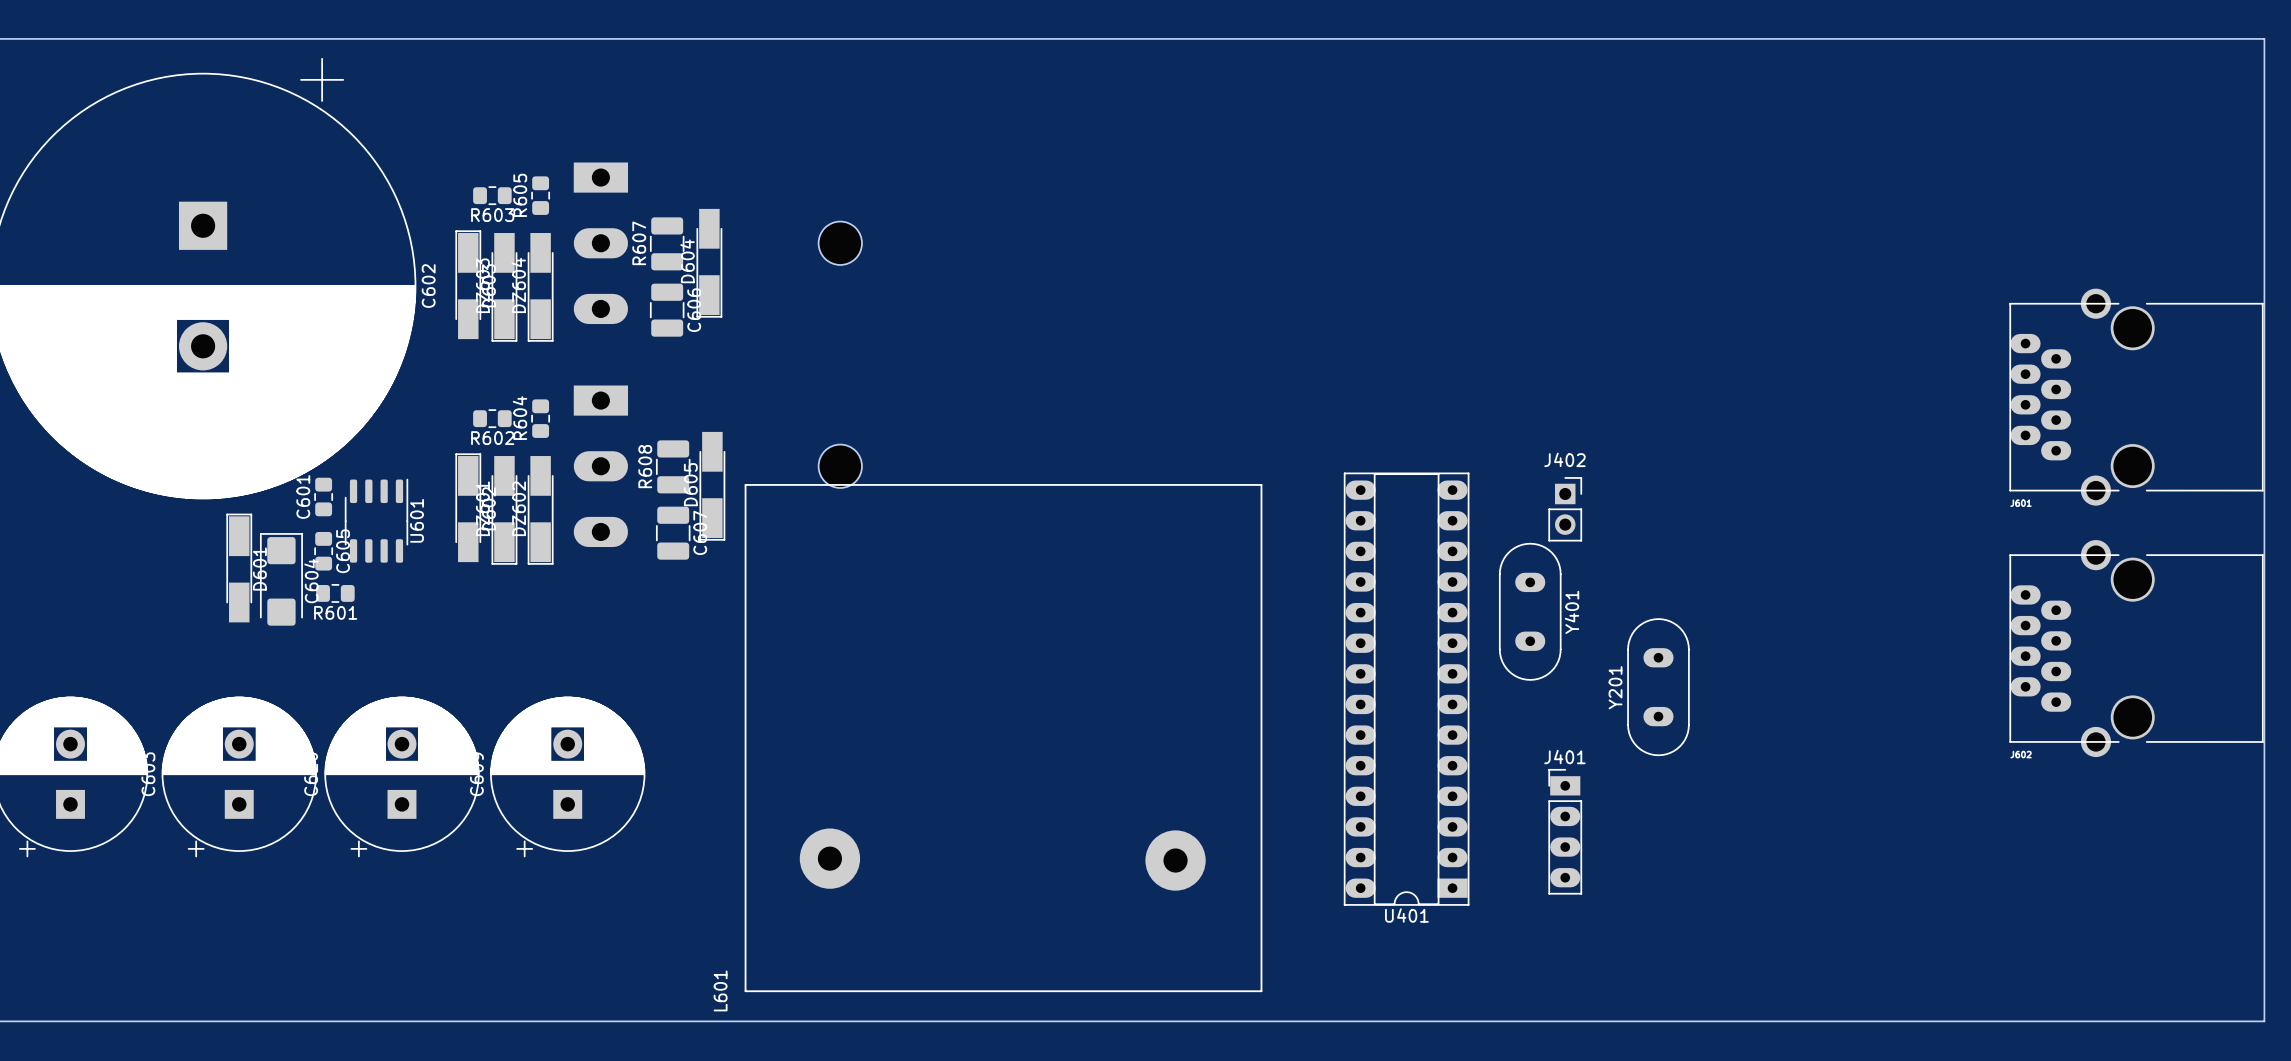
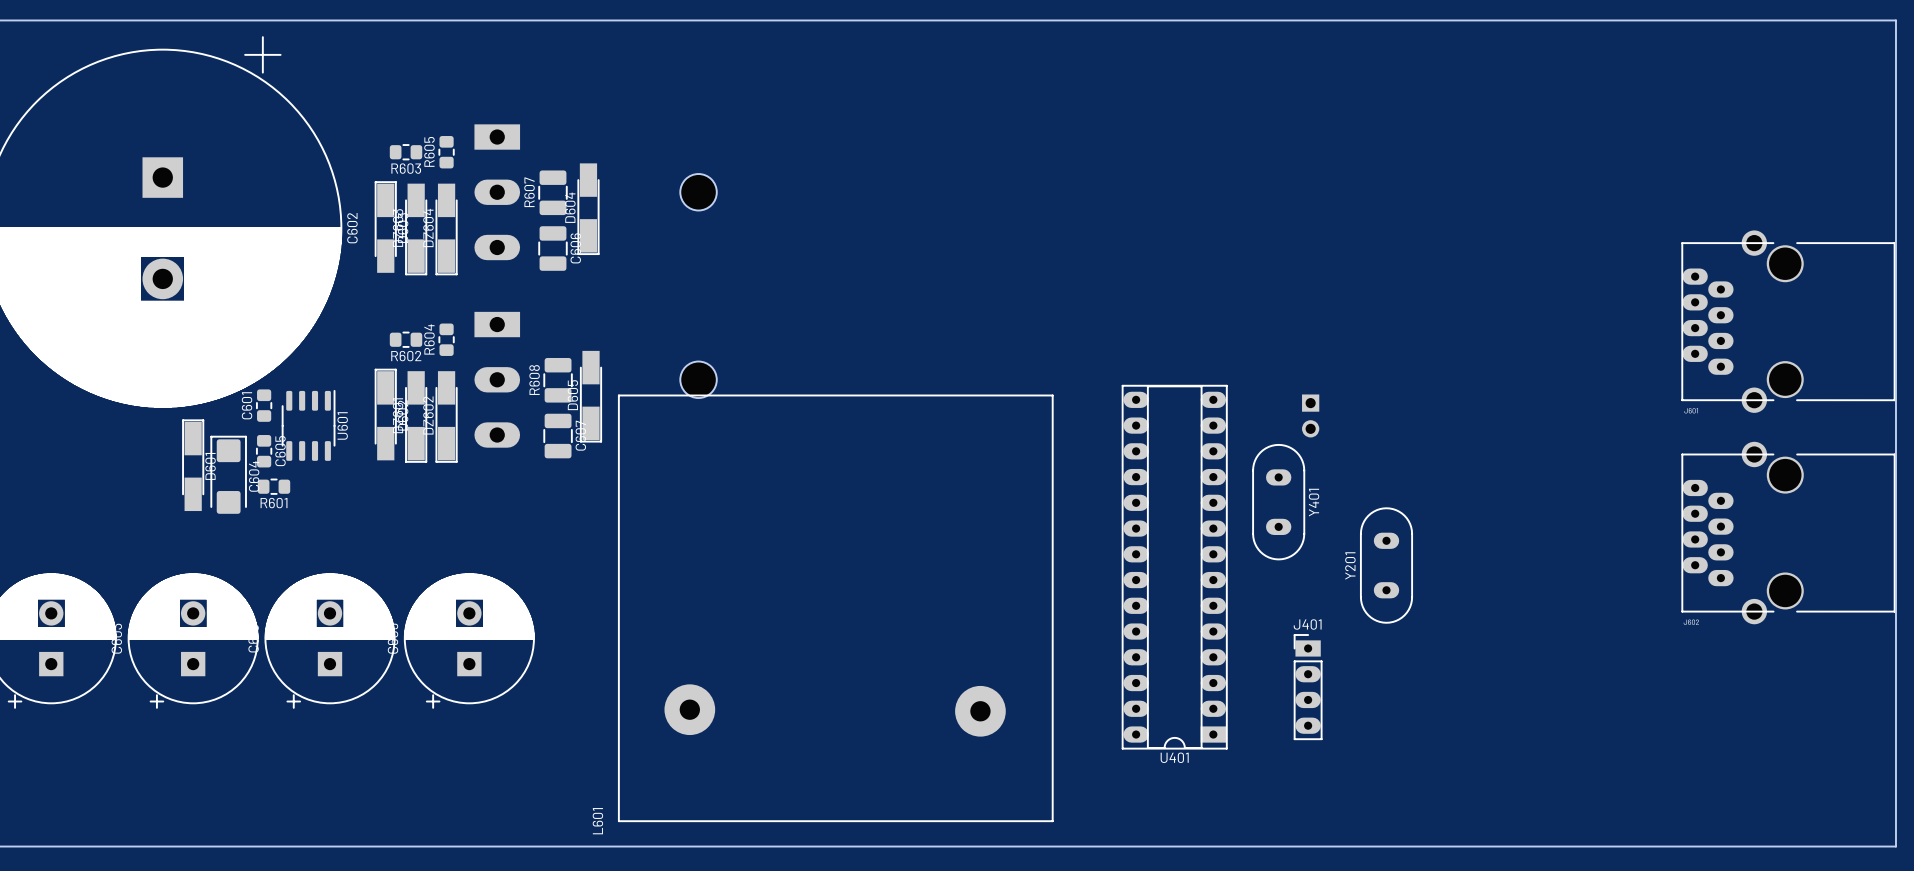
J402 side: top (1565, 509) -> bottom (1310, 415)

